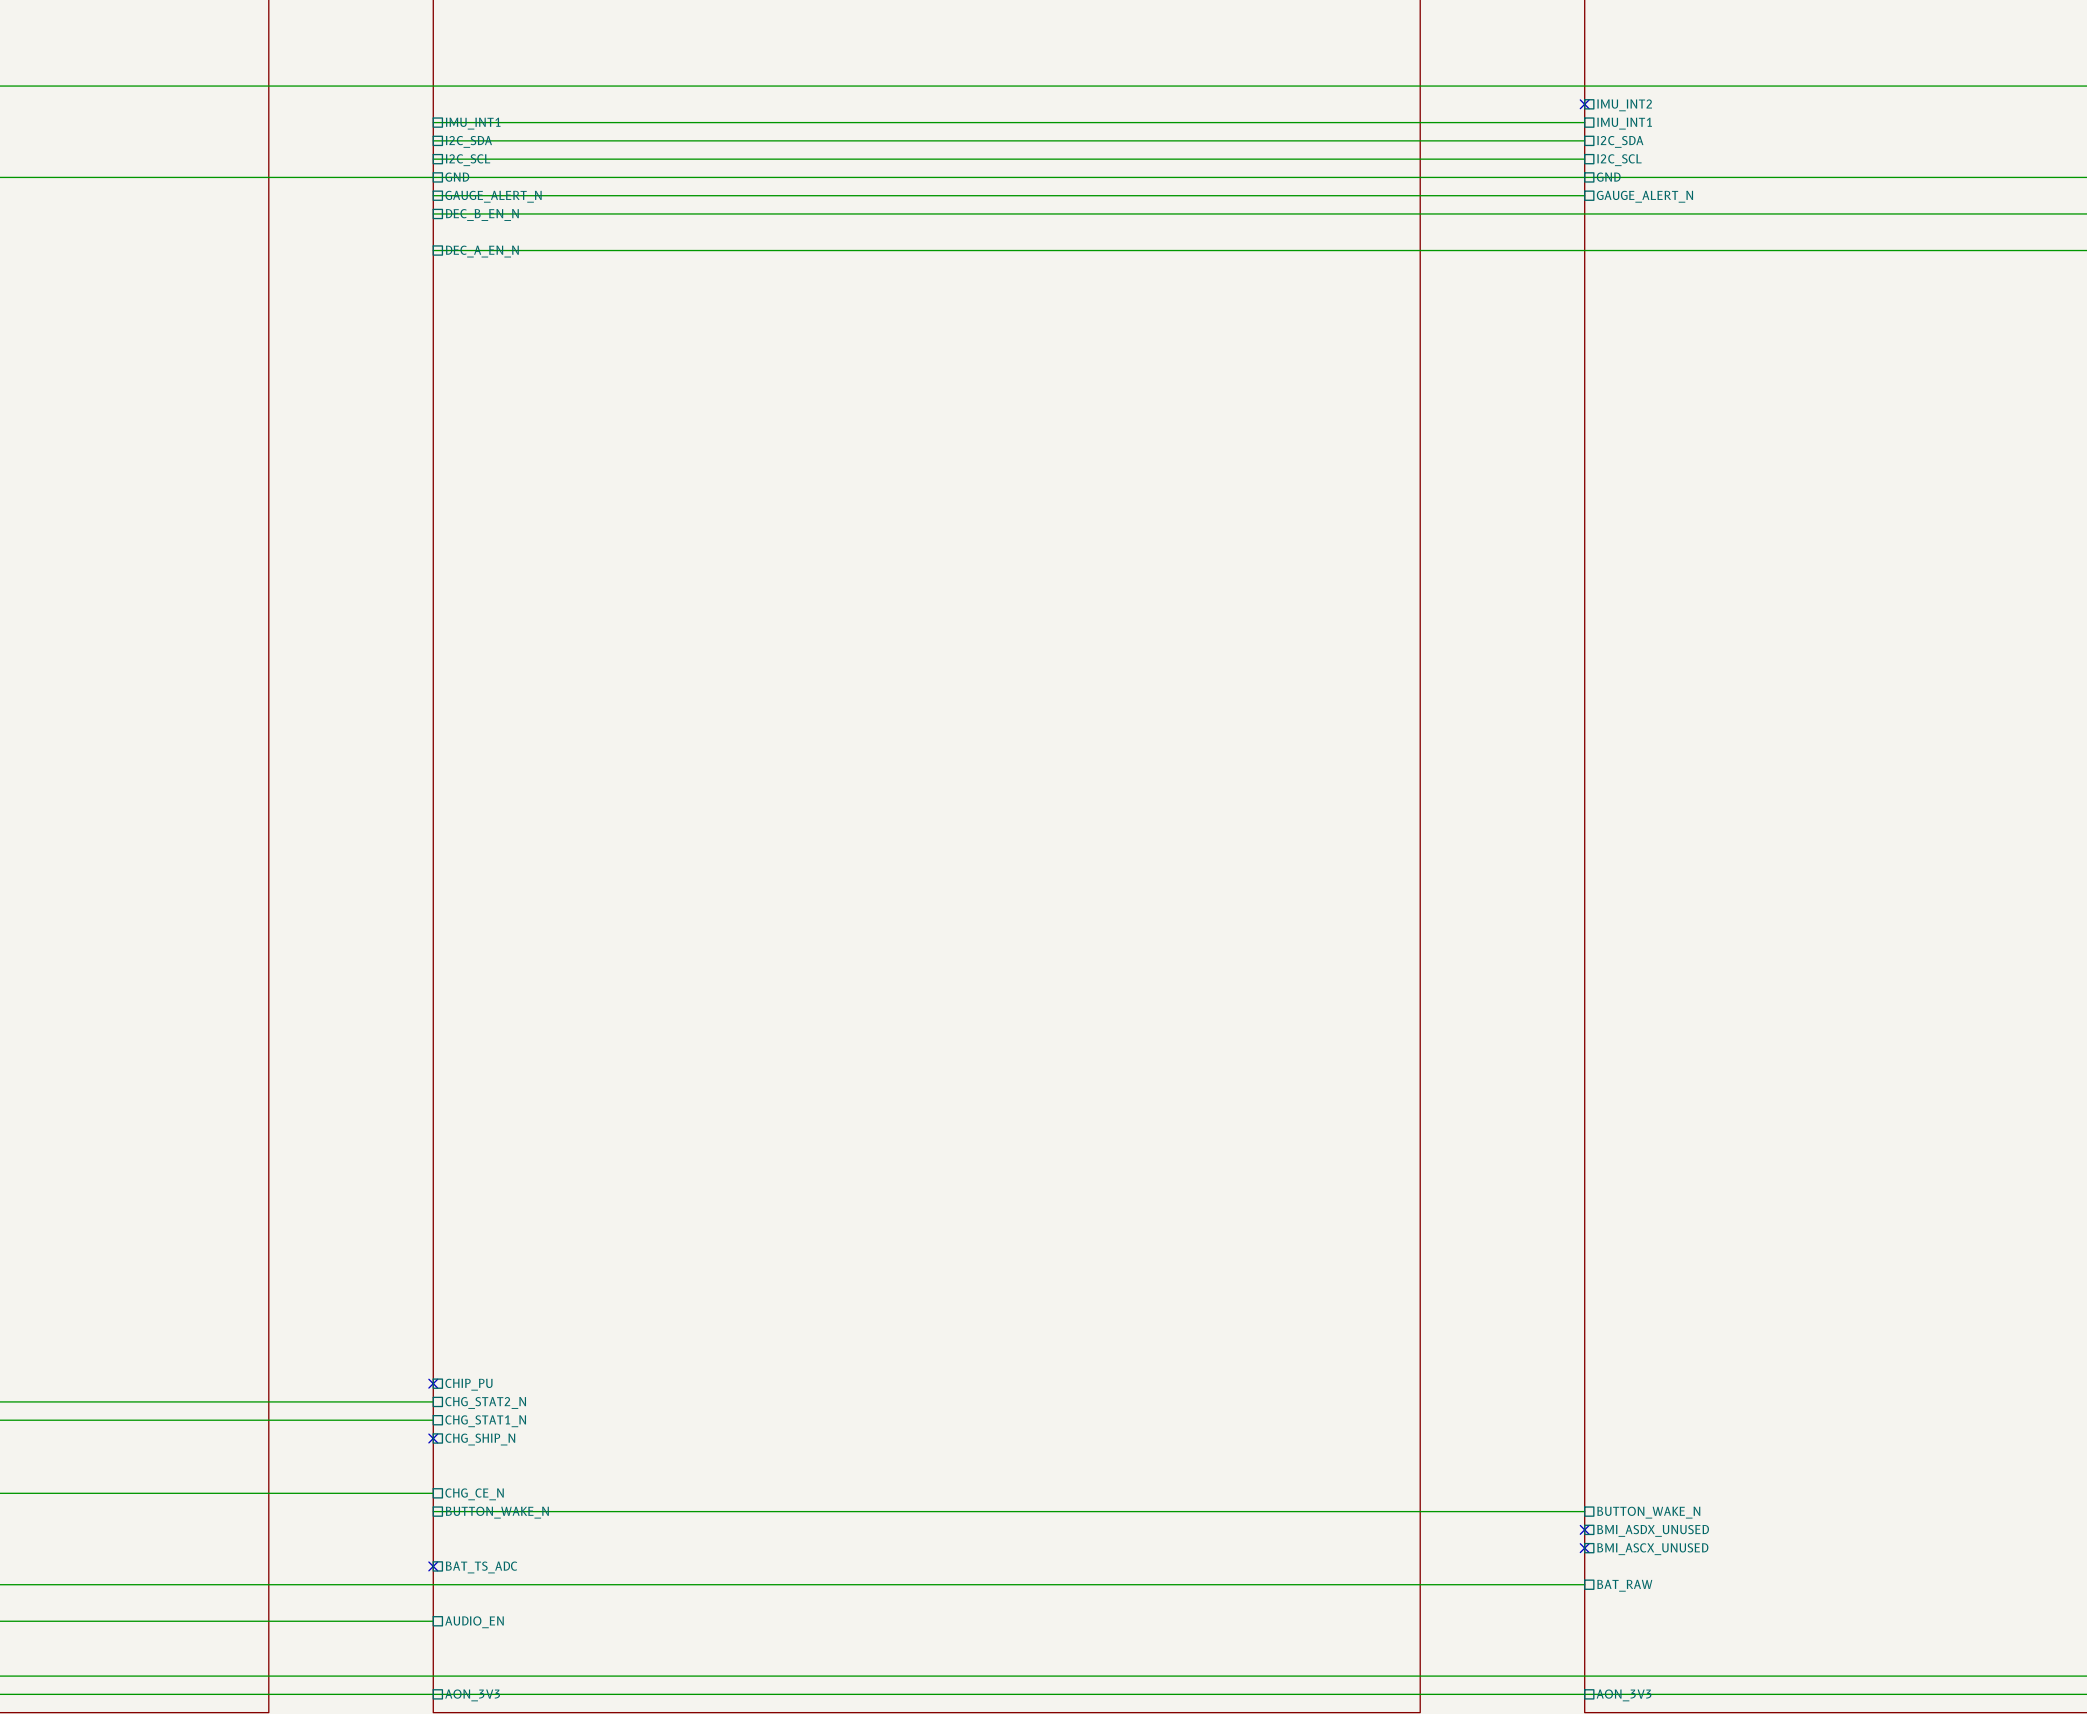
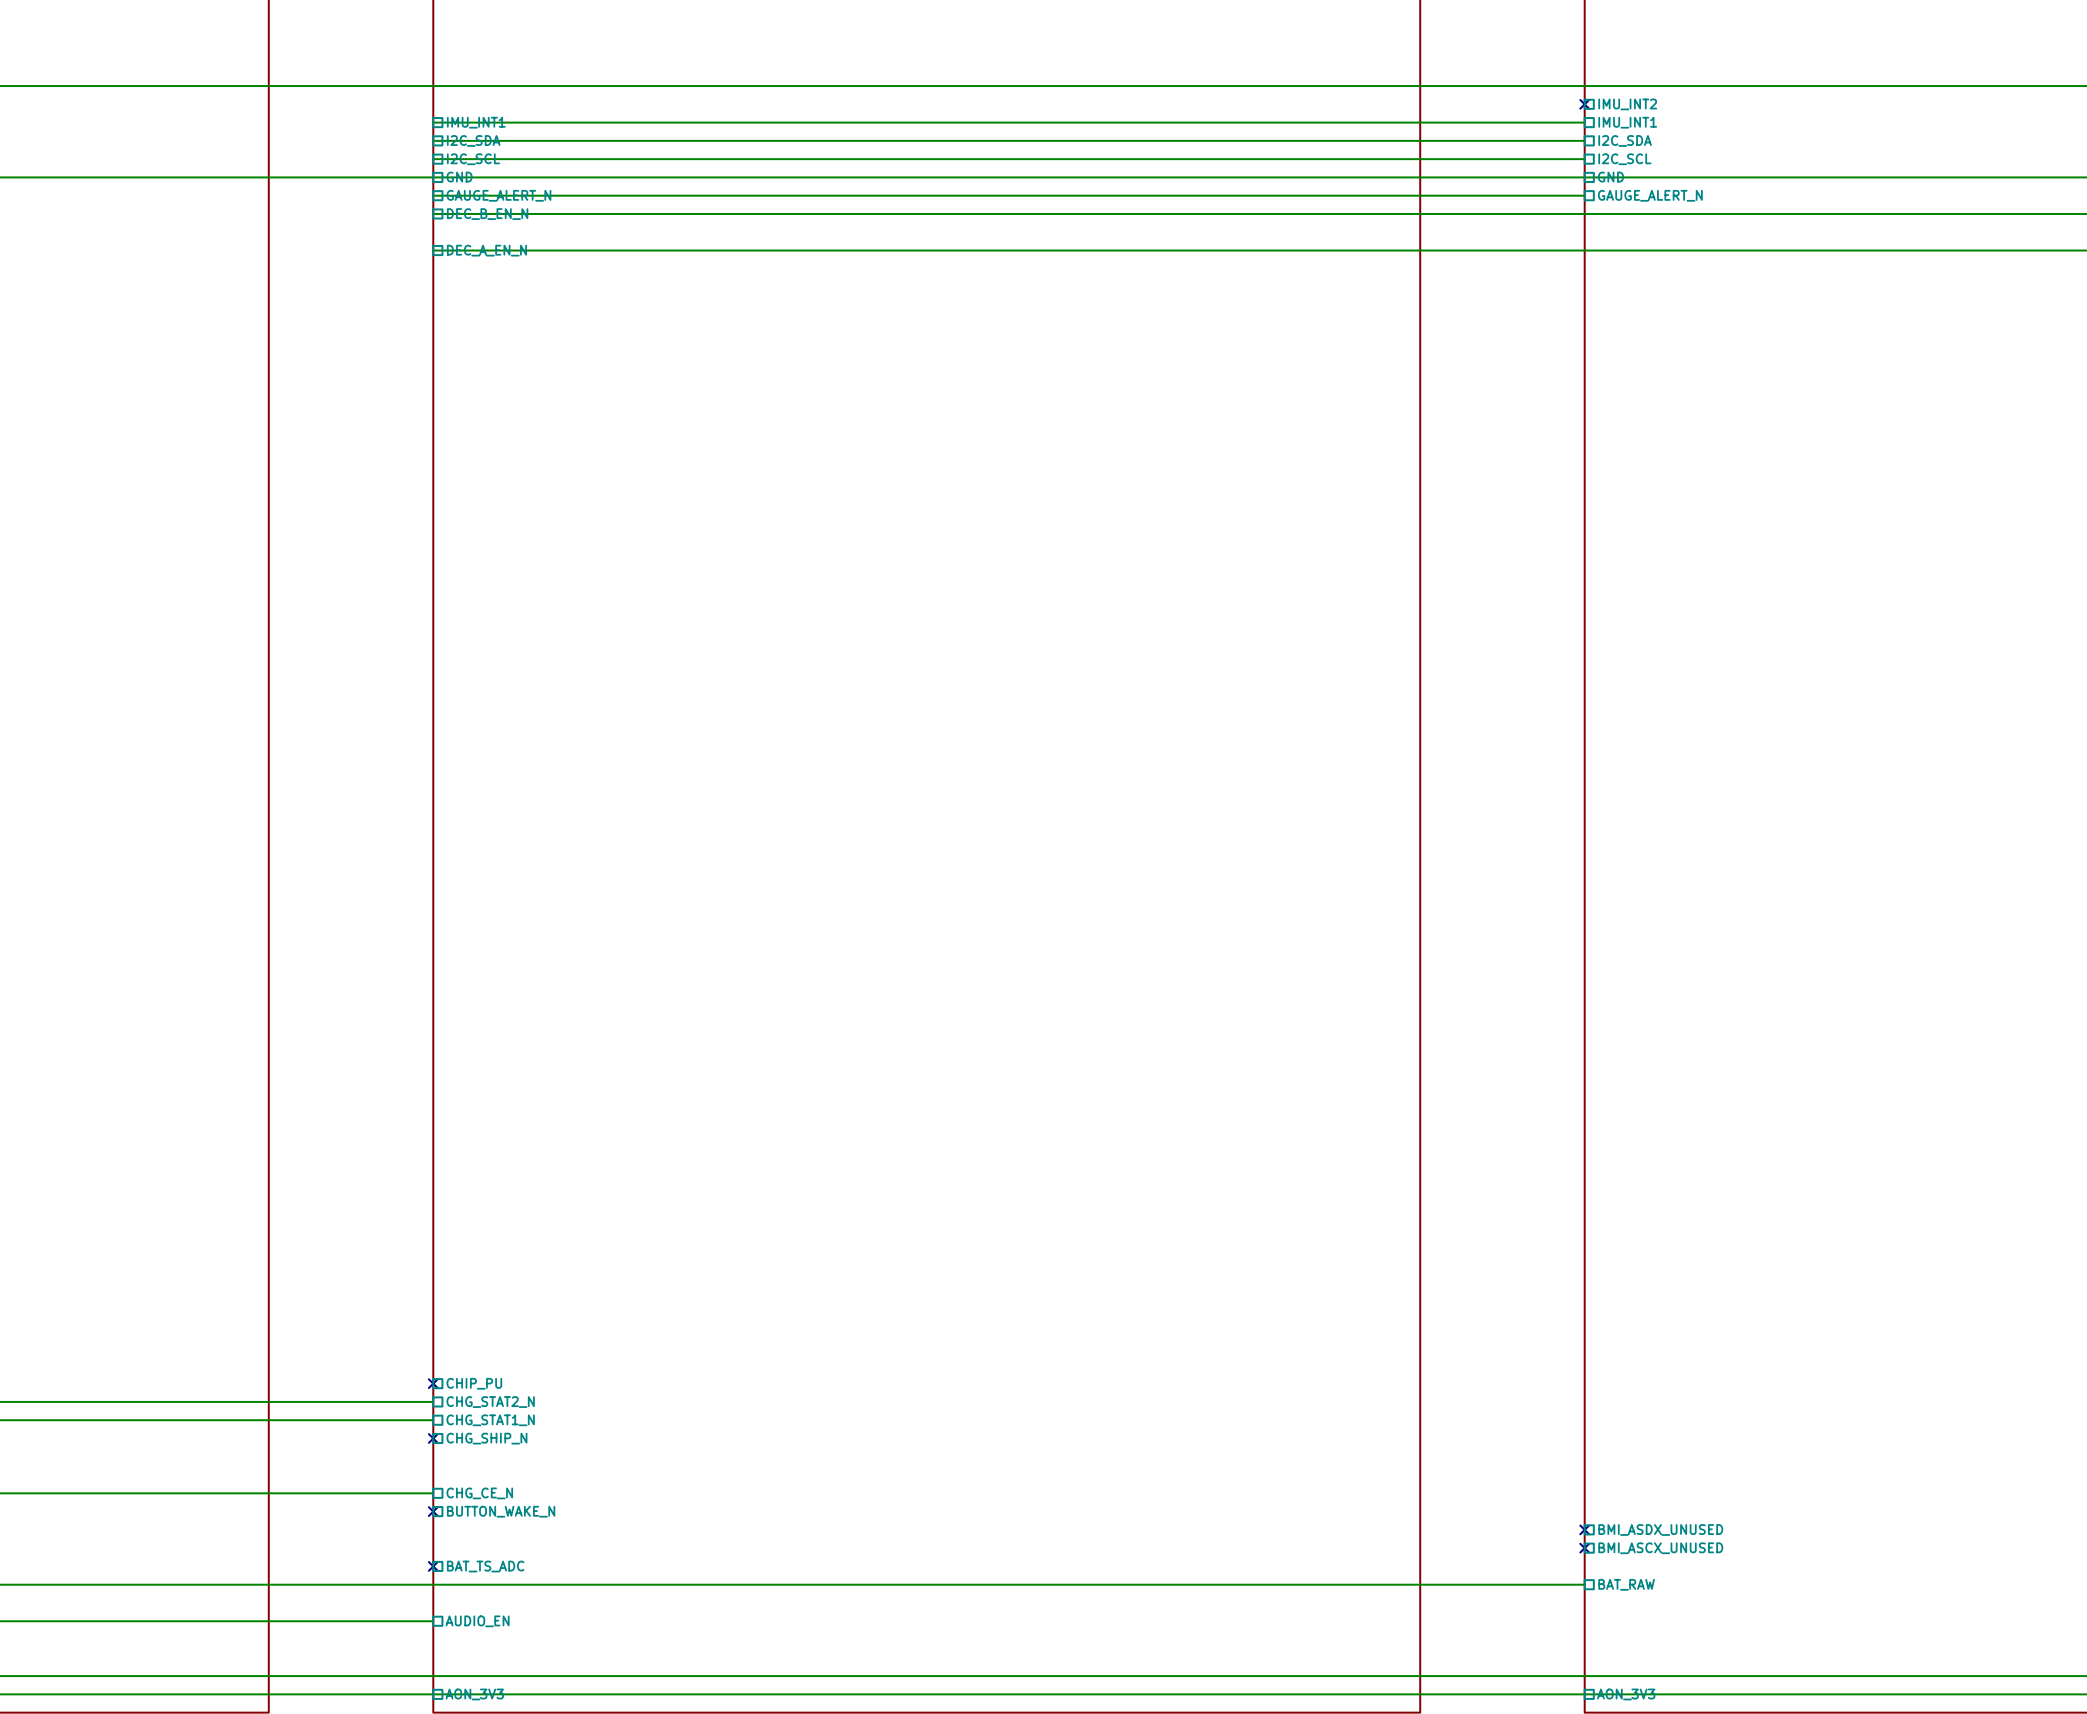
wire: (433, 1511) (1584, 1511) -> none
no-connect mark: none -> (433, 1511)
sheet pin: BUTTON_WAKE_N (1648, 1512) -> none

